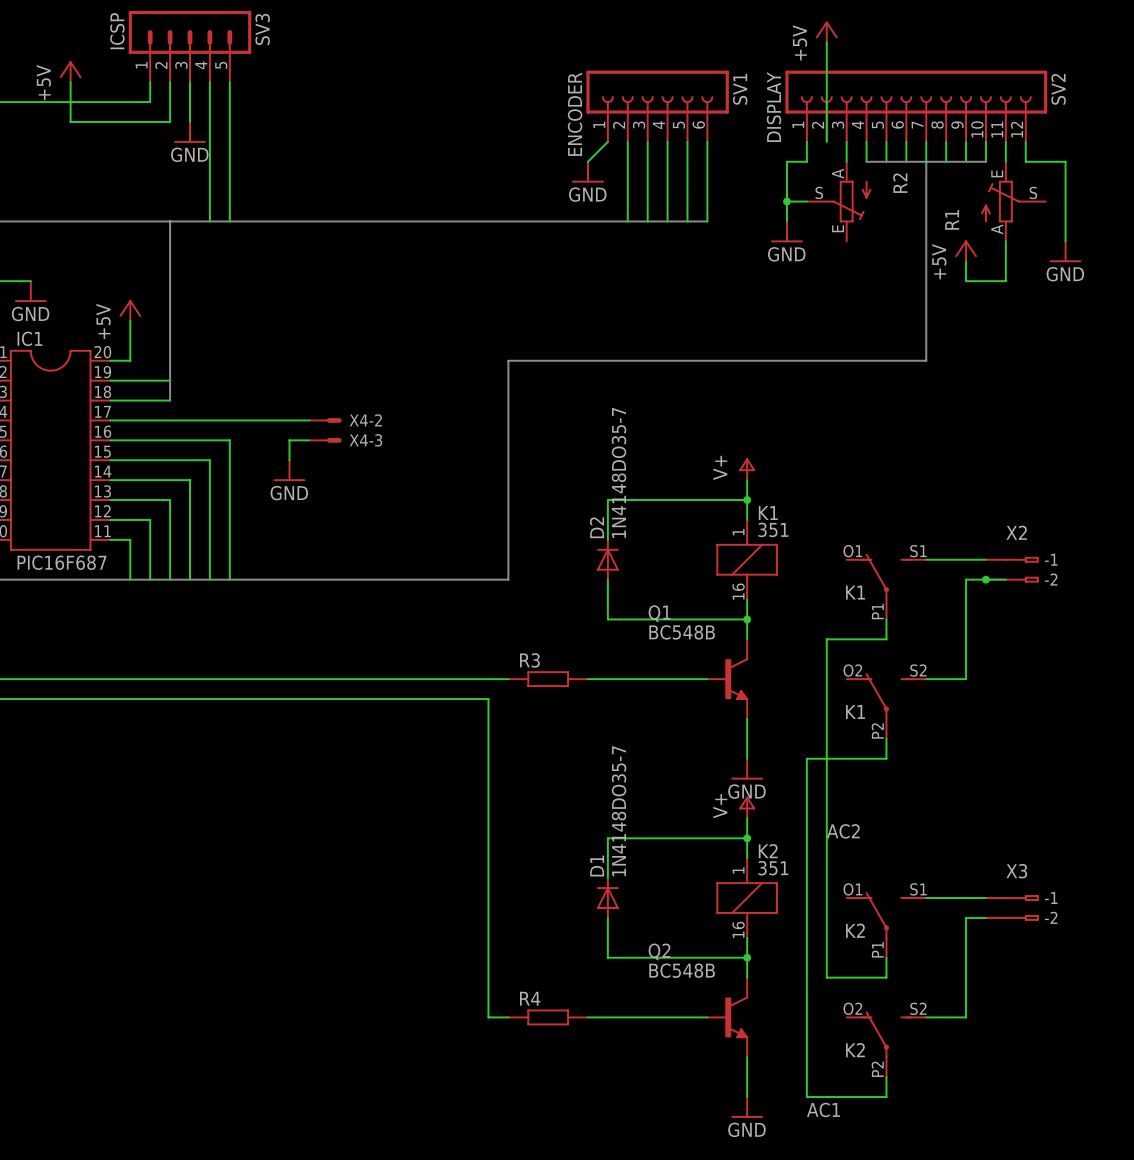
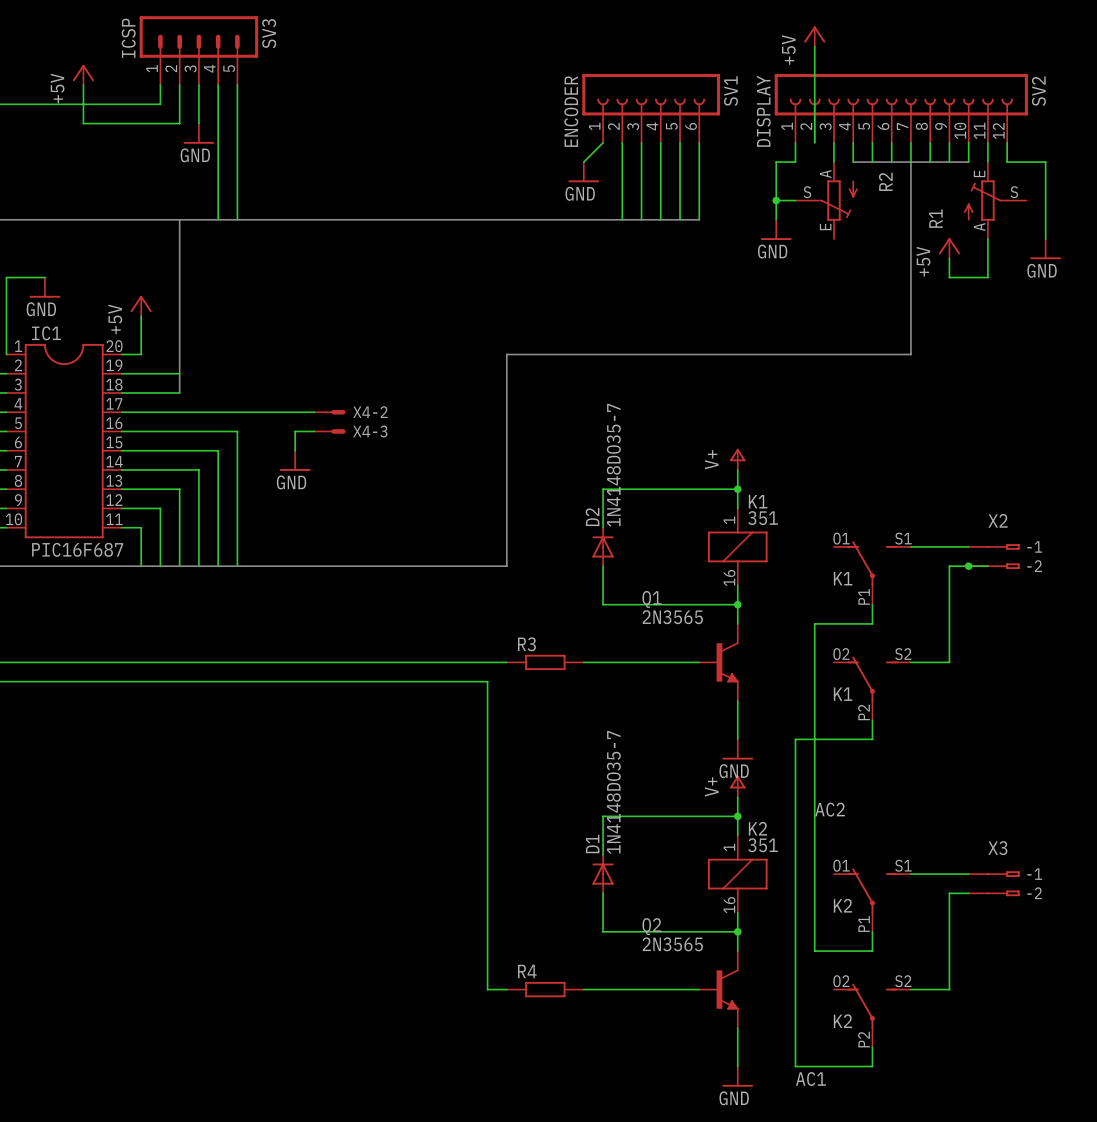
Q1 value: BC548B (682, 632) -> 2N3565 (672, 617)
Q2 value: BC548B (682, 970) -> 2N3565 (672, 944)

